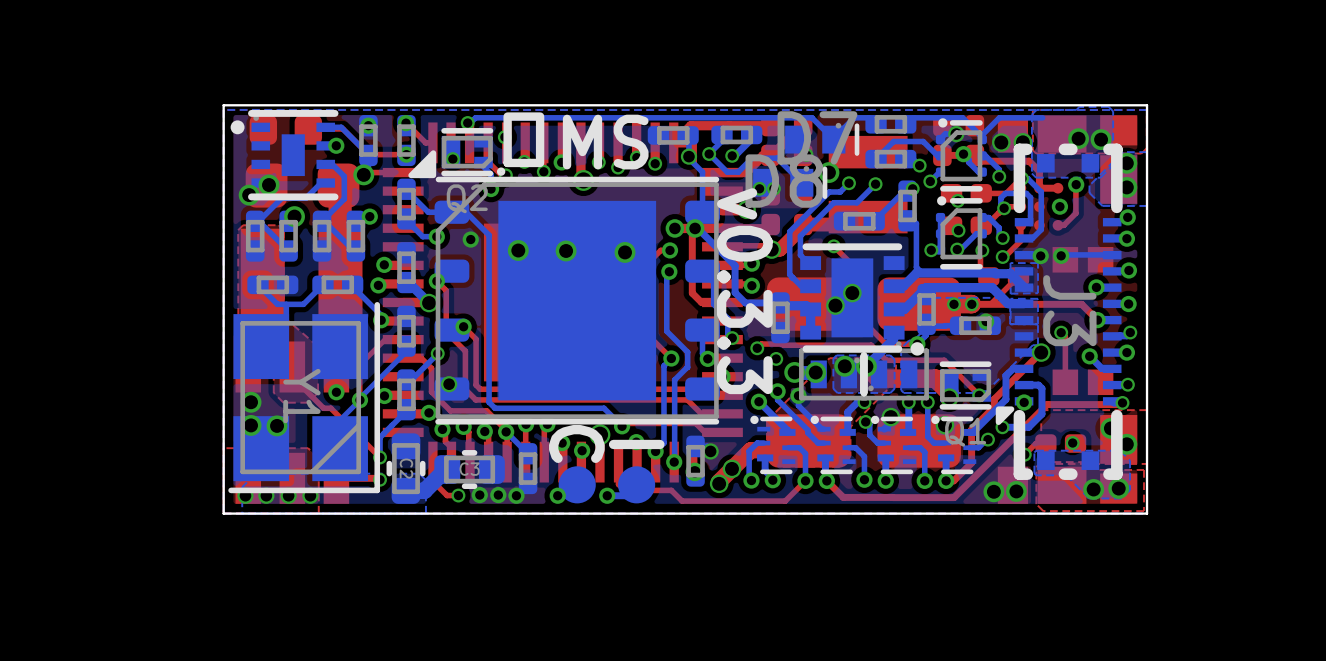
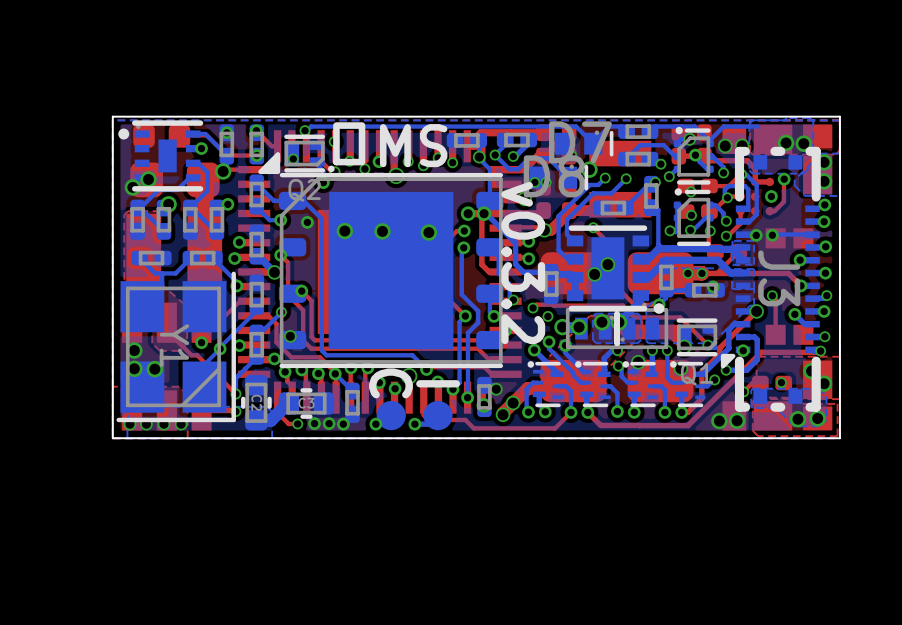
text: v0.3.3 (744, 291) -> v0.3.2 (523, 263)

